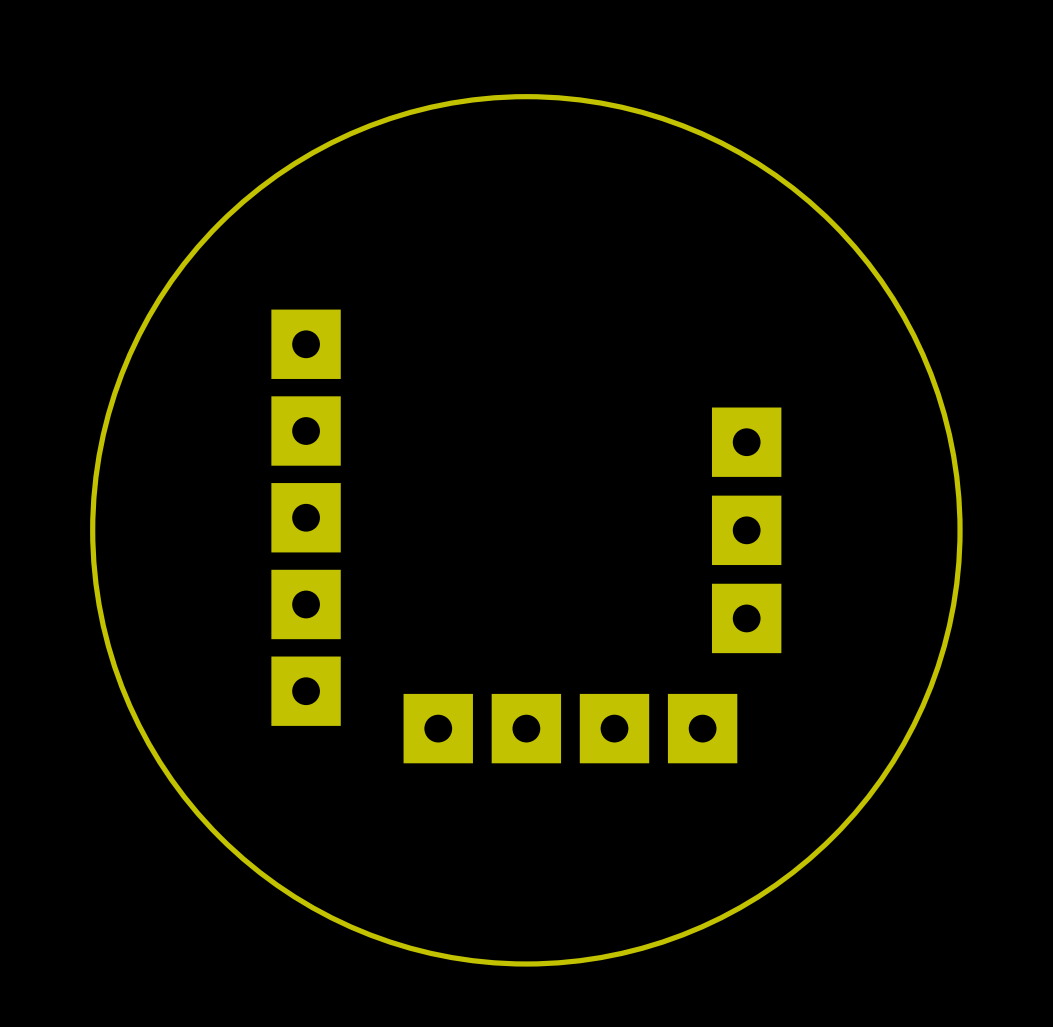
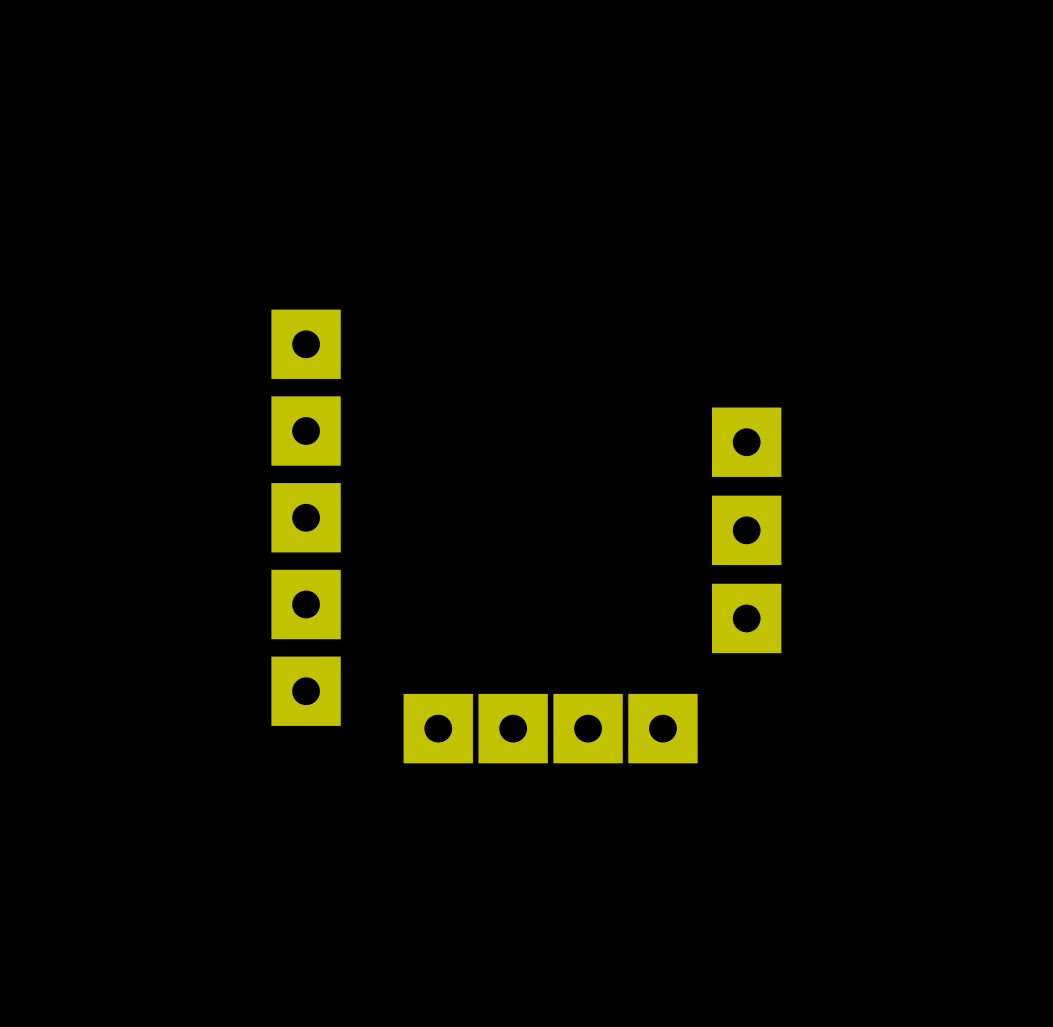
round board edge: [90, 94, 963, 967] -> none
part footprint: [403, 693, 738, 764] -> [403, 693, 698, 764]

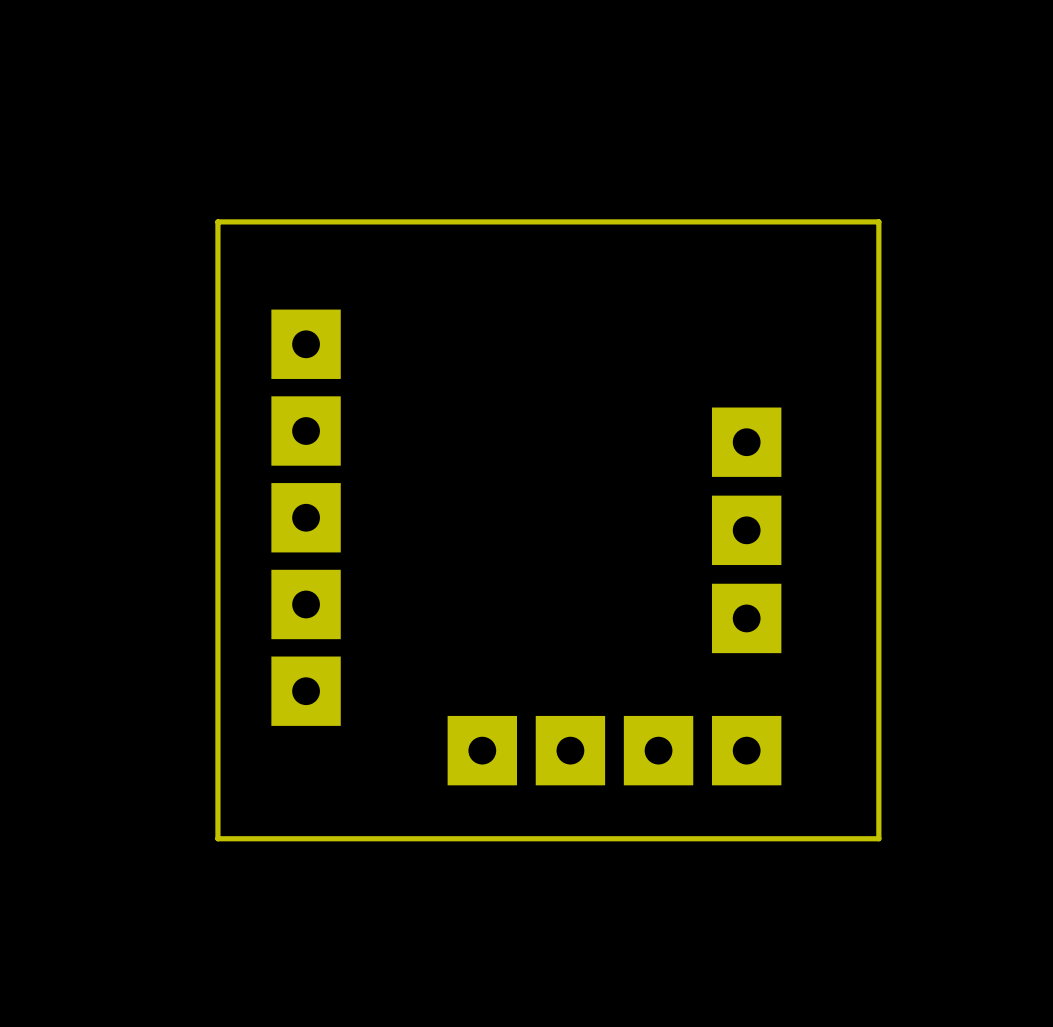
board edge: none -> (217, 221) (878, 221) (878, 838) (217, 838) (217, 221)
part: (550, 728) -> none
part: none -> (614, 750)

